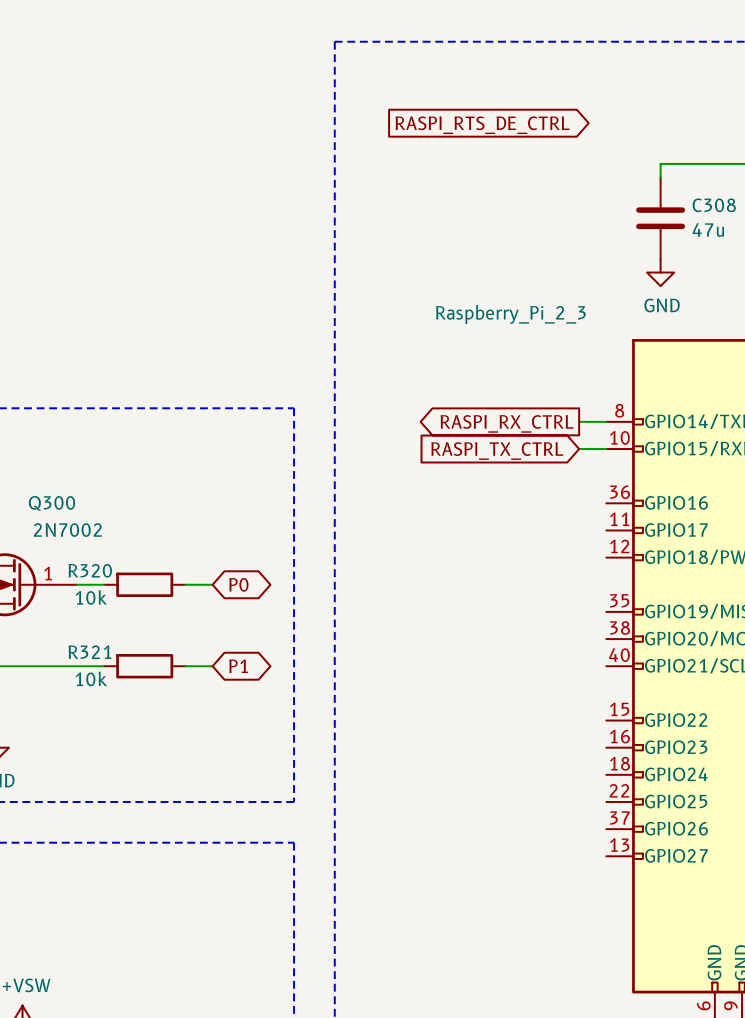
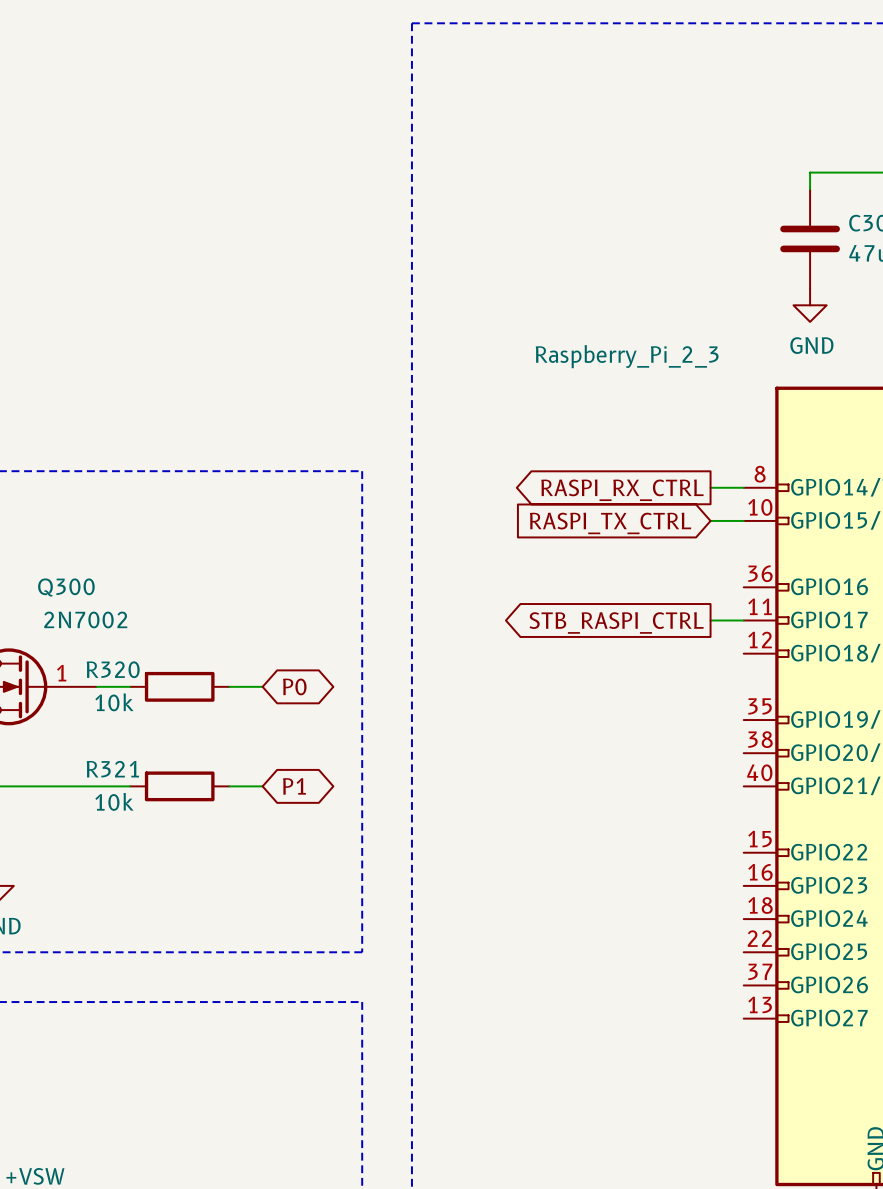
global label: RASPI_RTS_DE_CTRL (482, 125) -> none
wire: none -> (710, 620) (743, 620)
global label: none -> STB_RASPI_CTRL (616, 622)

